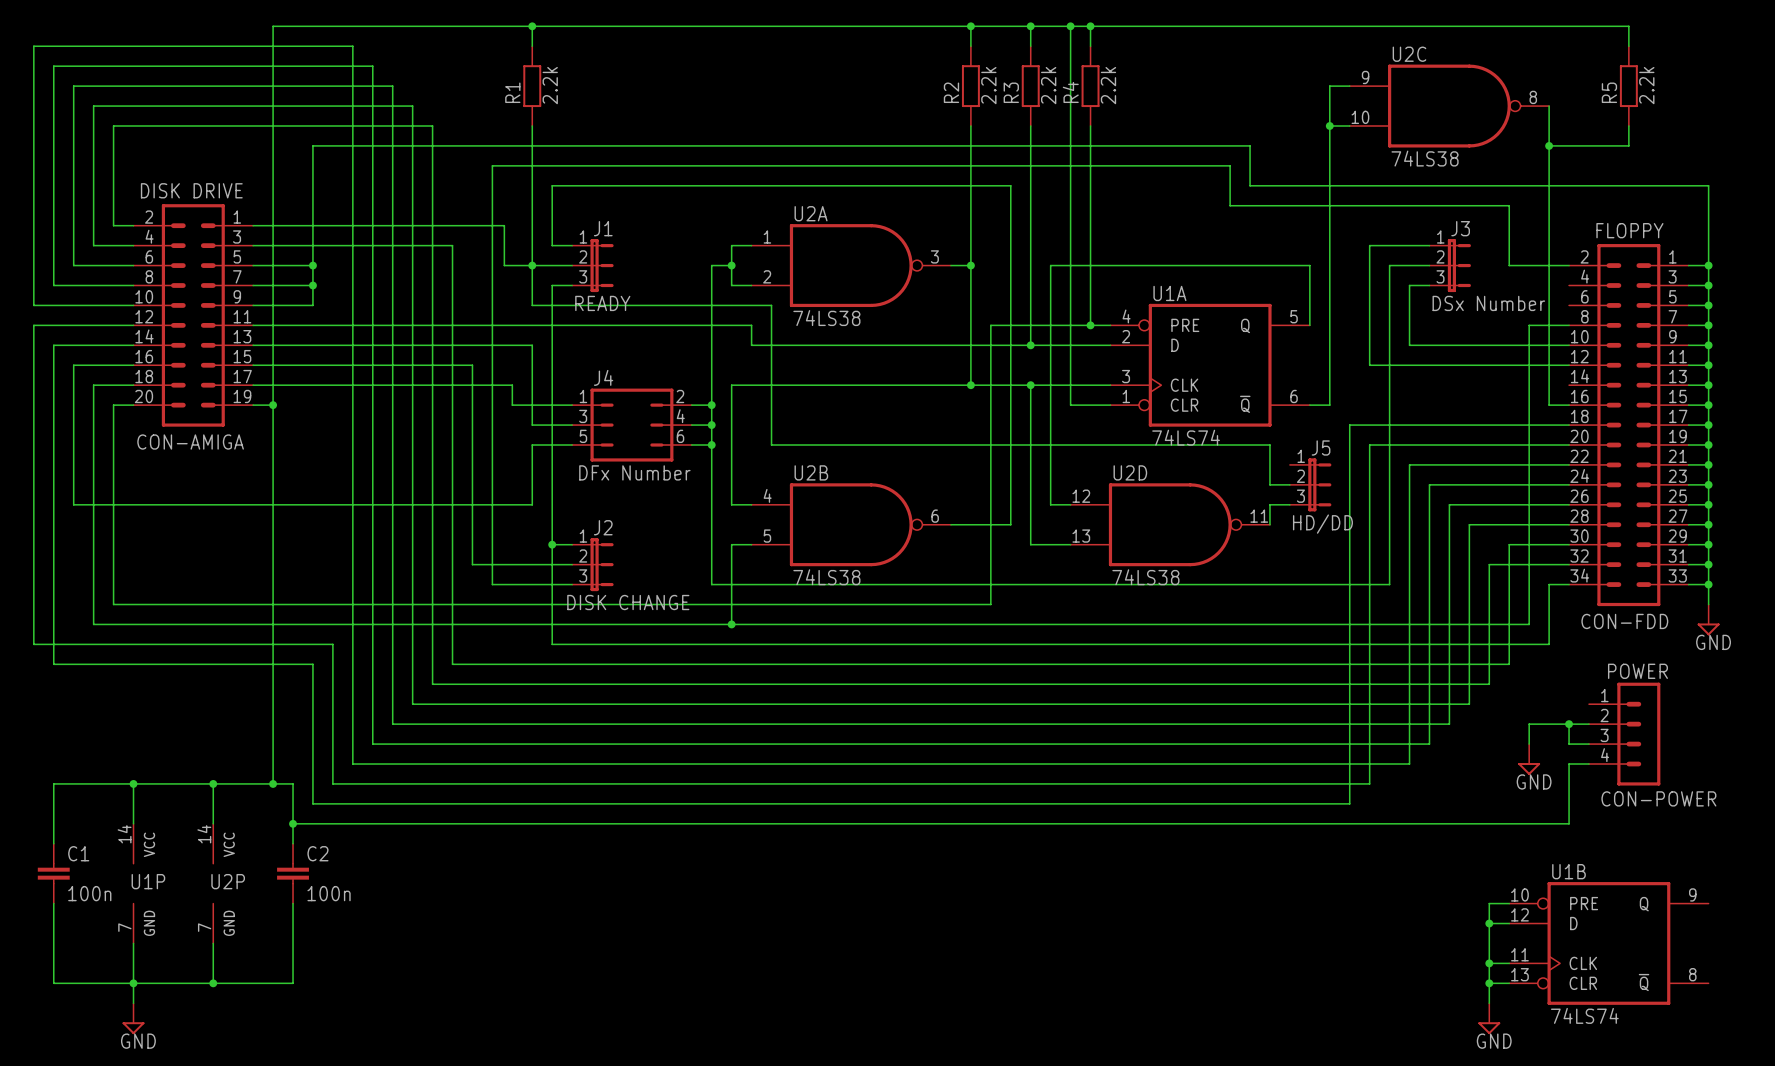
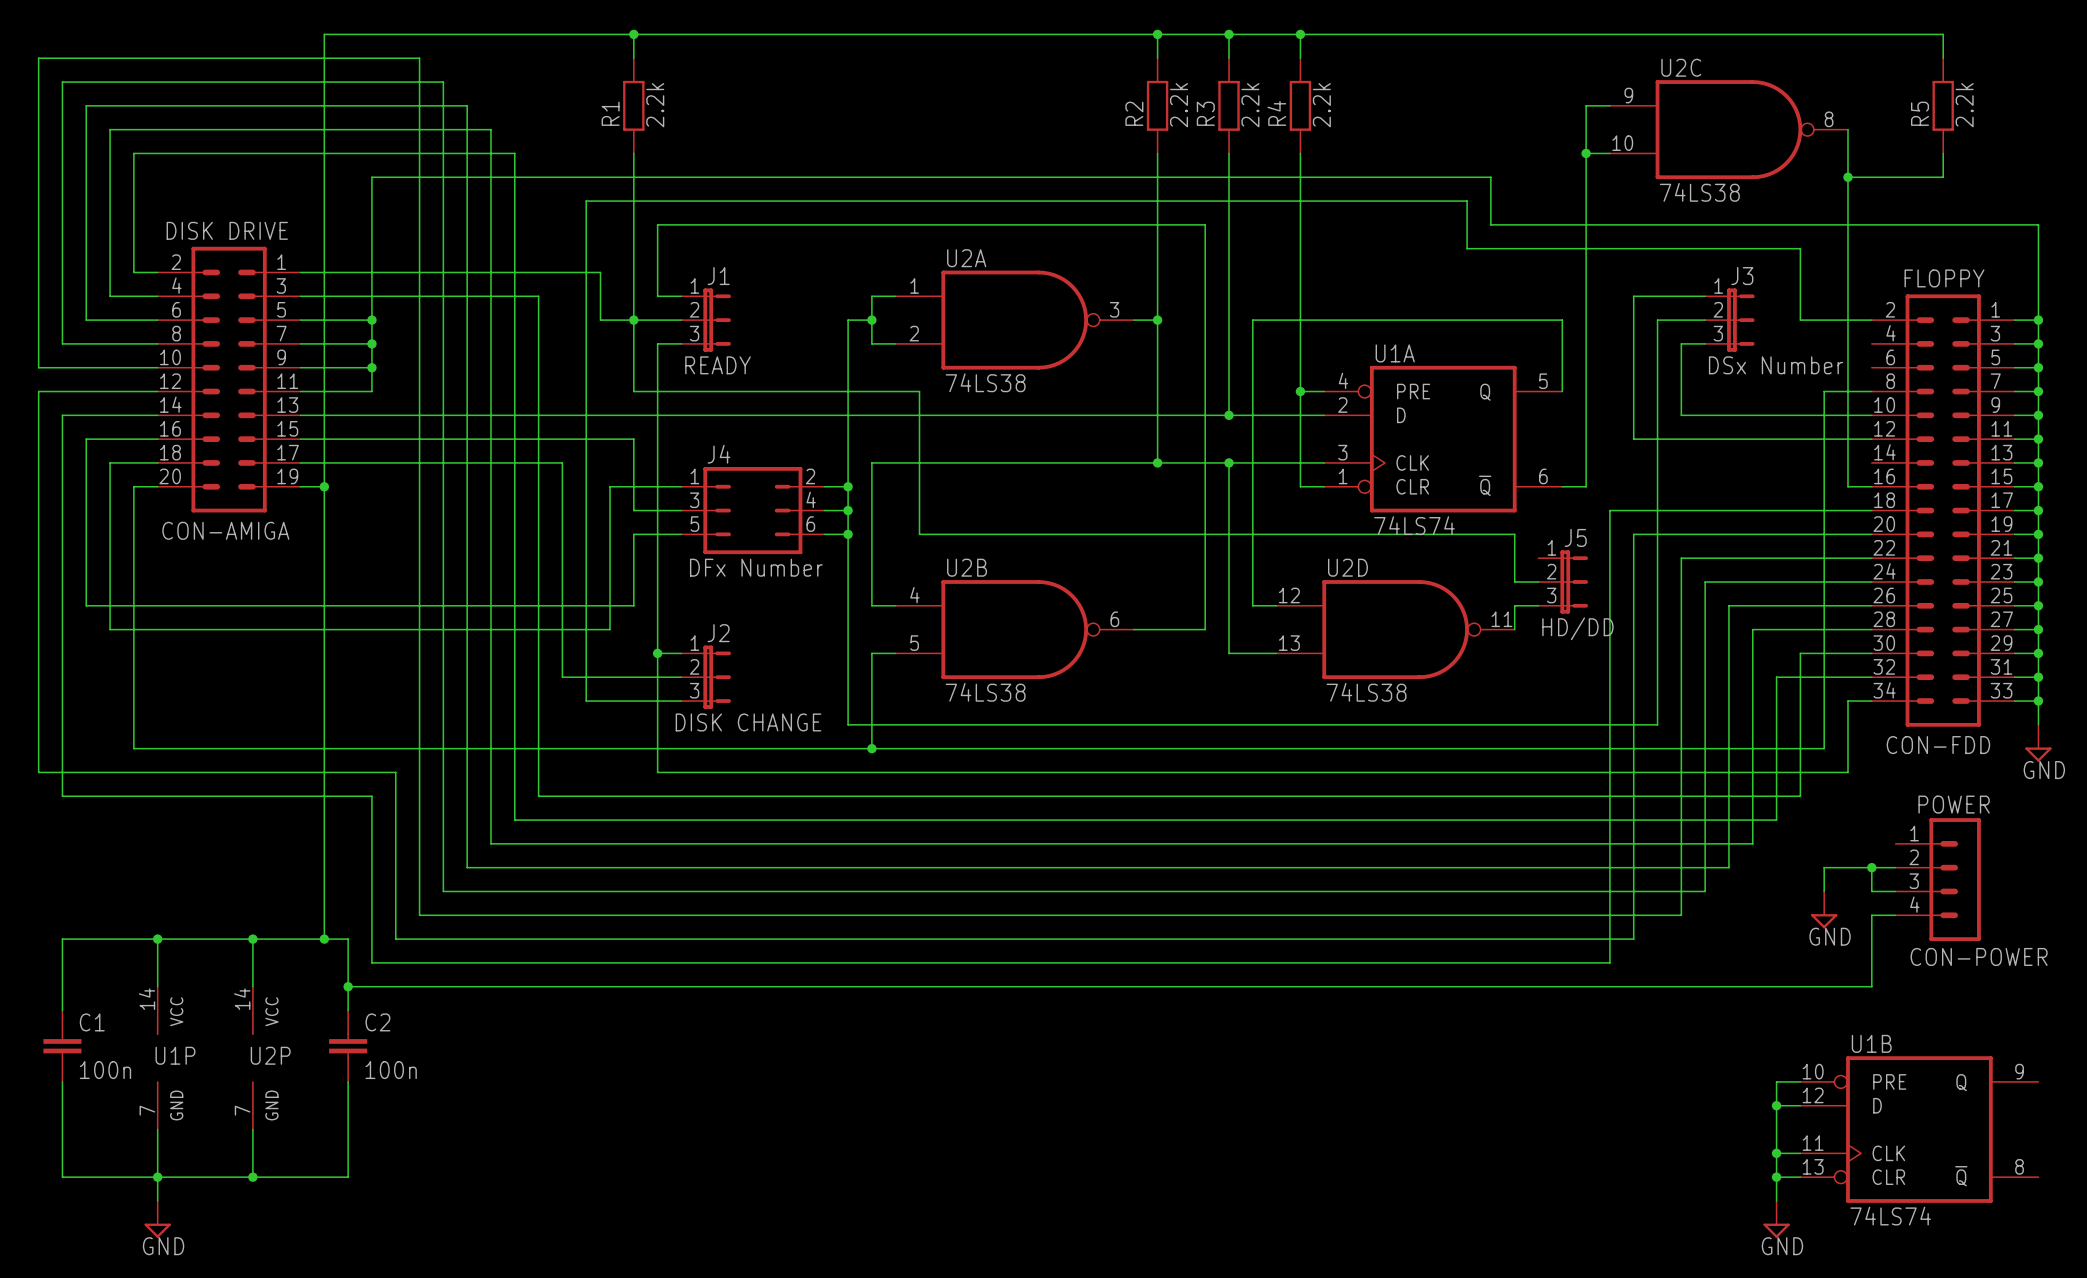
wire: (1070, 26) (1070, 405) (1090, 405) -> none
junction: (1070, 26) -> none
junction: none -> (371, 367)
wire: (532, 305) (771, 305) (771, 325) -> (633, 367) (633, 391)
wire: (312, 325) (532, 325) -> (371, 391) (371, 367)
wire: (751, 325) (751, 345) -> (895, 391) (919, 391)
wire: (1090, 325) (990, 325) (990, 604) -> (1300, 391) (1300, 486)
wire: (532, 345) (532, 365) -> (633, 415) (895, 415)
wire: (472, 365) (472, 385) (512, 385) (512, 405) -> (562, 439) (633, 439)
wire: none -> (610, 486) (610, 629) (110, 629)
wire: (93, 524) (93, 624) (113, 624) -> (133, 724) (133, 748)
wire: (711, 584) (1389, 584) -> (1181, 724) (1657, 724) (1657, 701)
wire: (113, 604) (711, 604) -> (848, 701) (848, 724)

